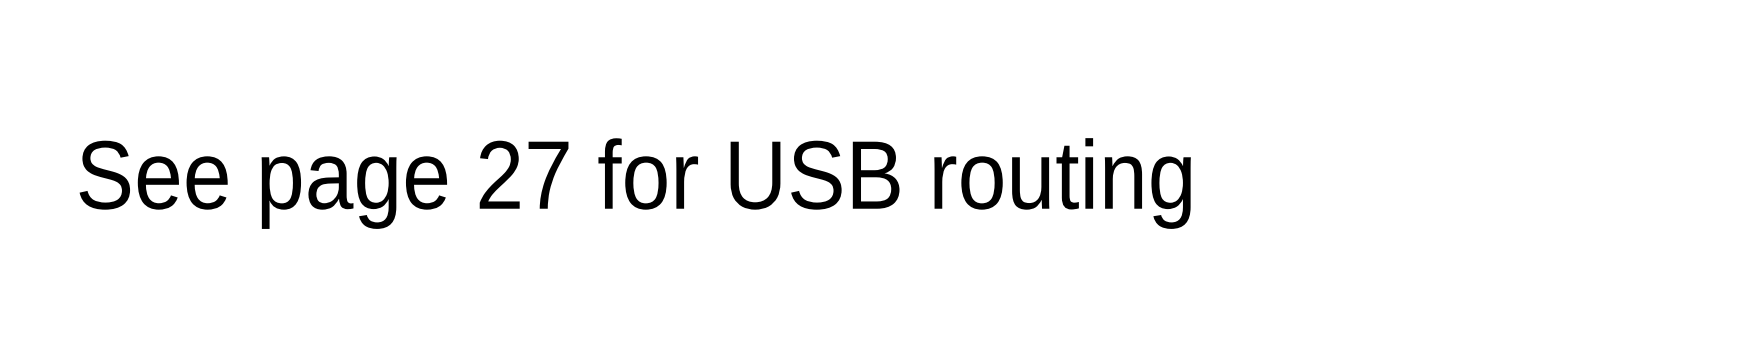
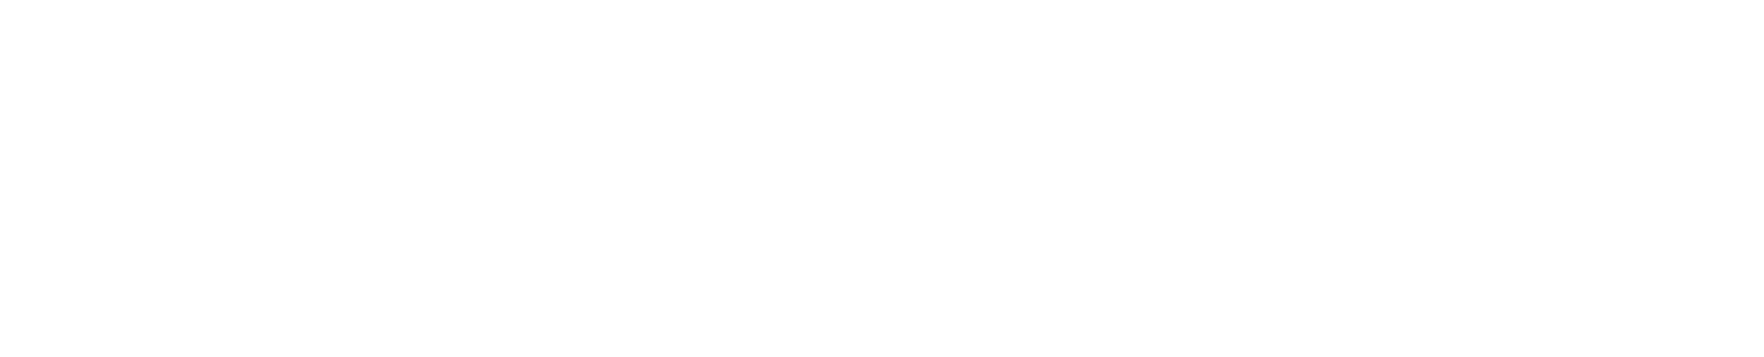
text: See page 27 for USB routing (635, 183) -> none

